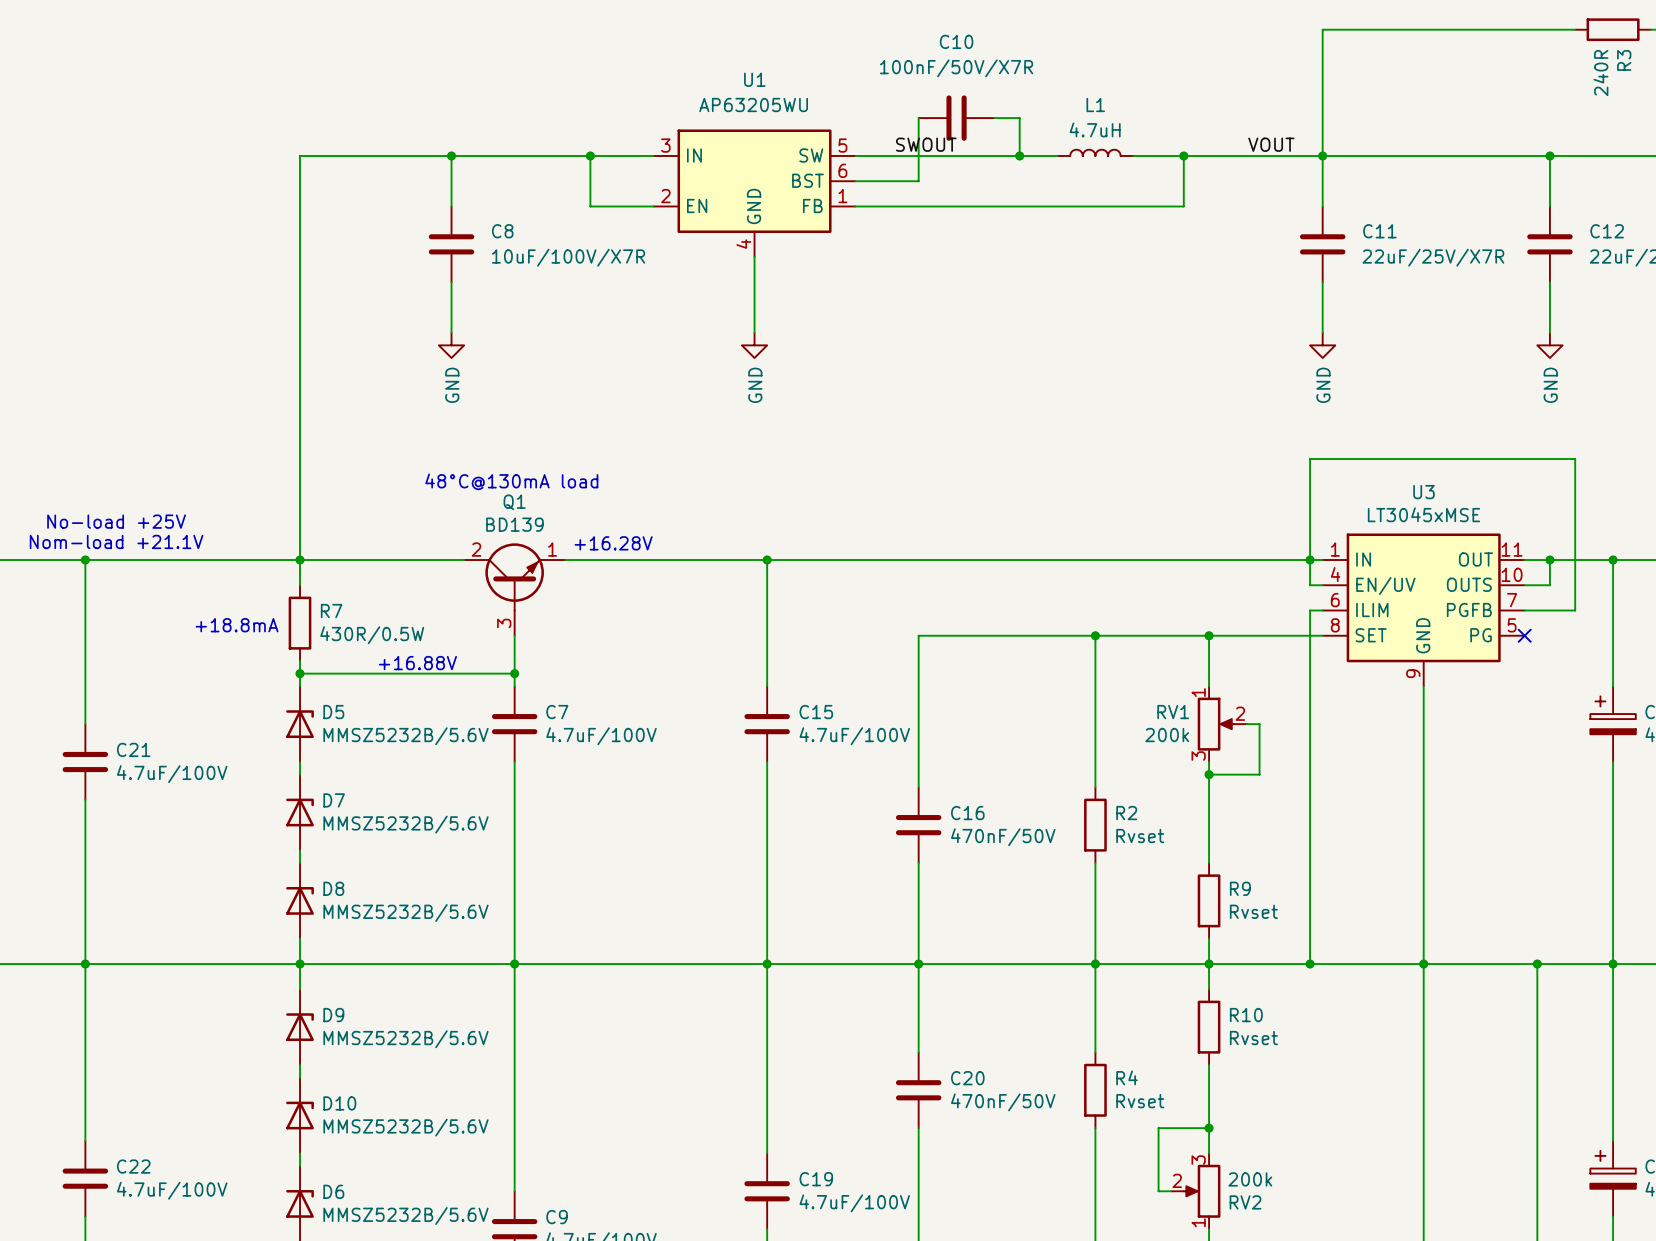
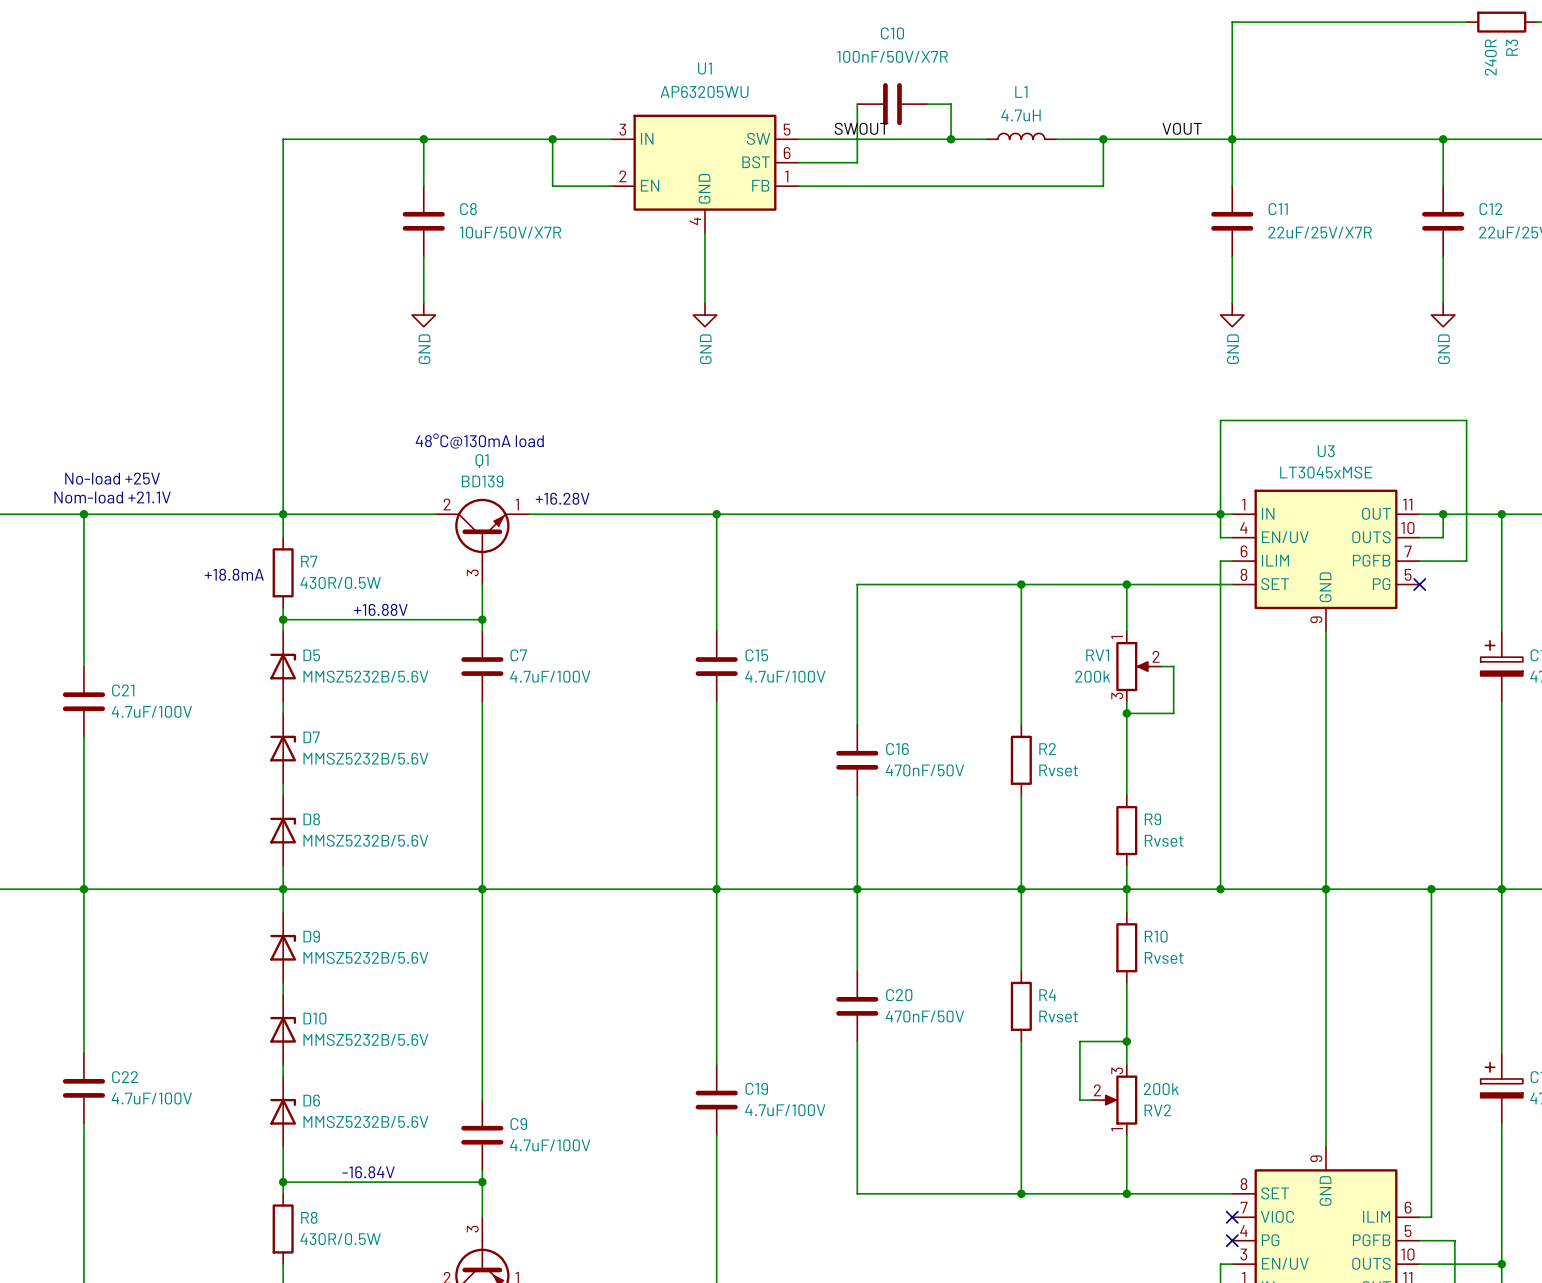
C8 value: 10uF/100V/X7R (568, 257) -> 10uF/50V/X7R (510, 232)

